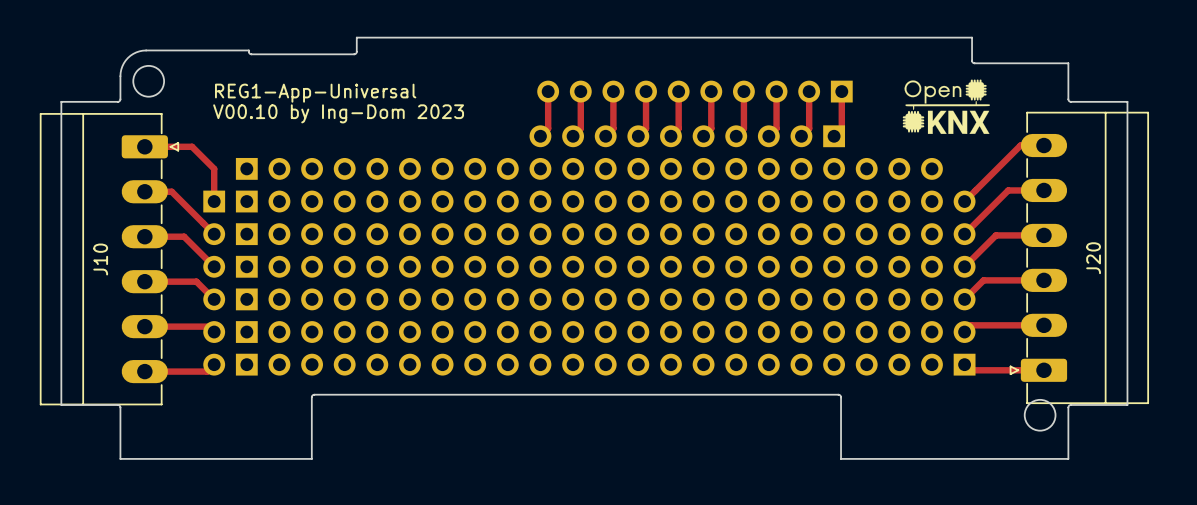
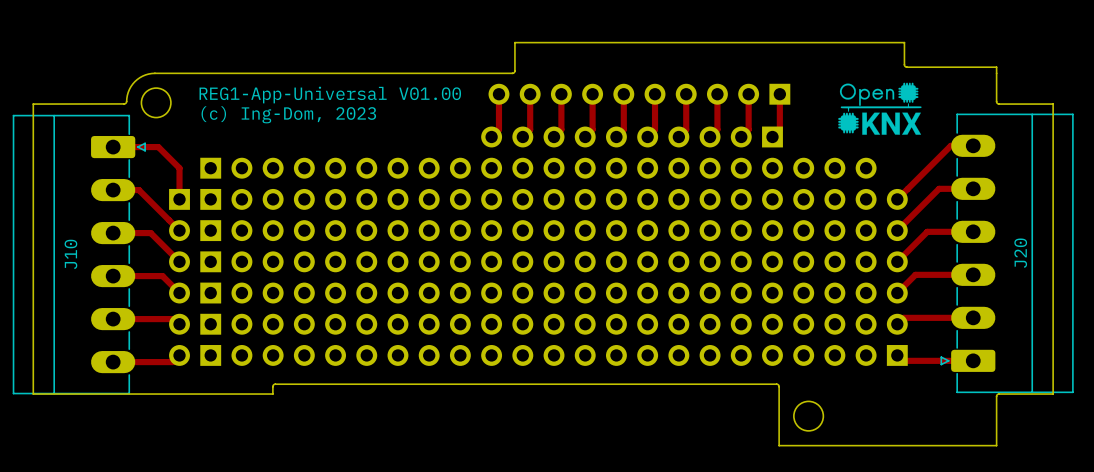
board edge: (564, 37) (356, 37) (356, 52) (354, 54) (251, 54) (248, 50) (142, 50) (130, 55) (122, 66) (119, 101) (61, 101) -> (514, 42) (514, 71) (512, 73) (151, 73) (142, 76) (132, 83) (128, 92) (126, 101)
round board edge position: (148, 81) -> (156, 102)
text: REG1-App-Universal (315, 93) -> REG1-App-Universal V01.00 (330, 95)
board edge: none -> (126, 101) (124, 103) (33, 104)
text: V00.10 by Ing-Dom 2023 (338, 113) -> (c) Ing-Dom, 2023 (288, 114)
board edge: (117, 404) (120, 407) (120, 458) (311, 458) (311, 404) -> (87, 394) (272, 394)
round board edge position: (1040, 415) -> (808, 416)

